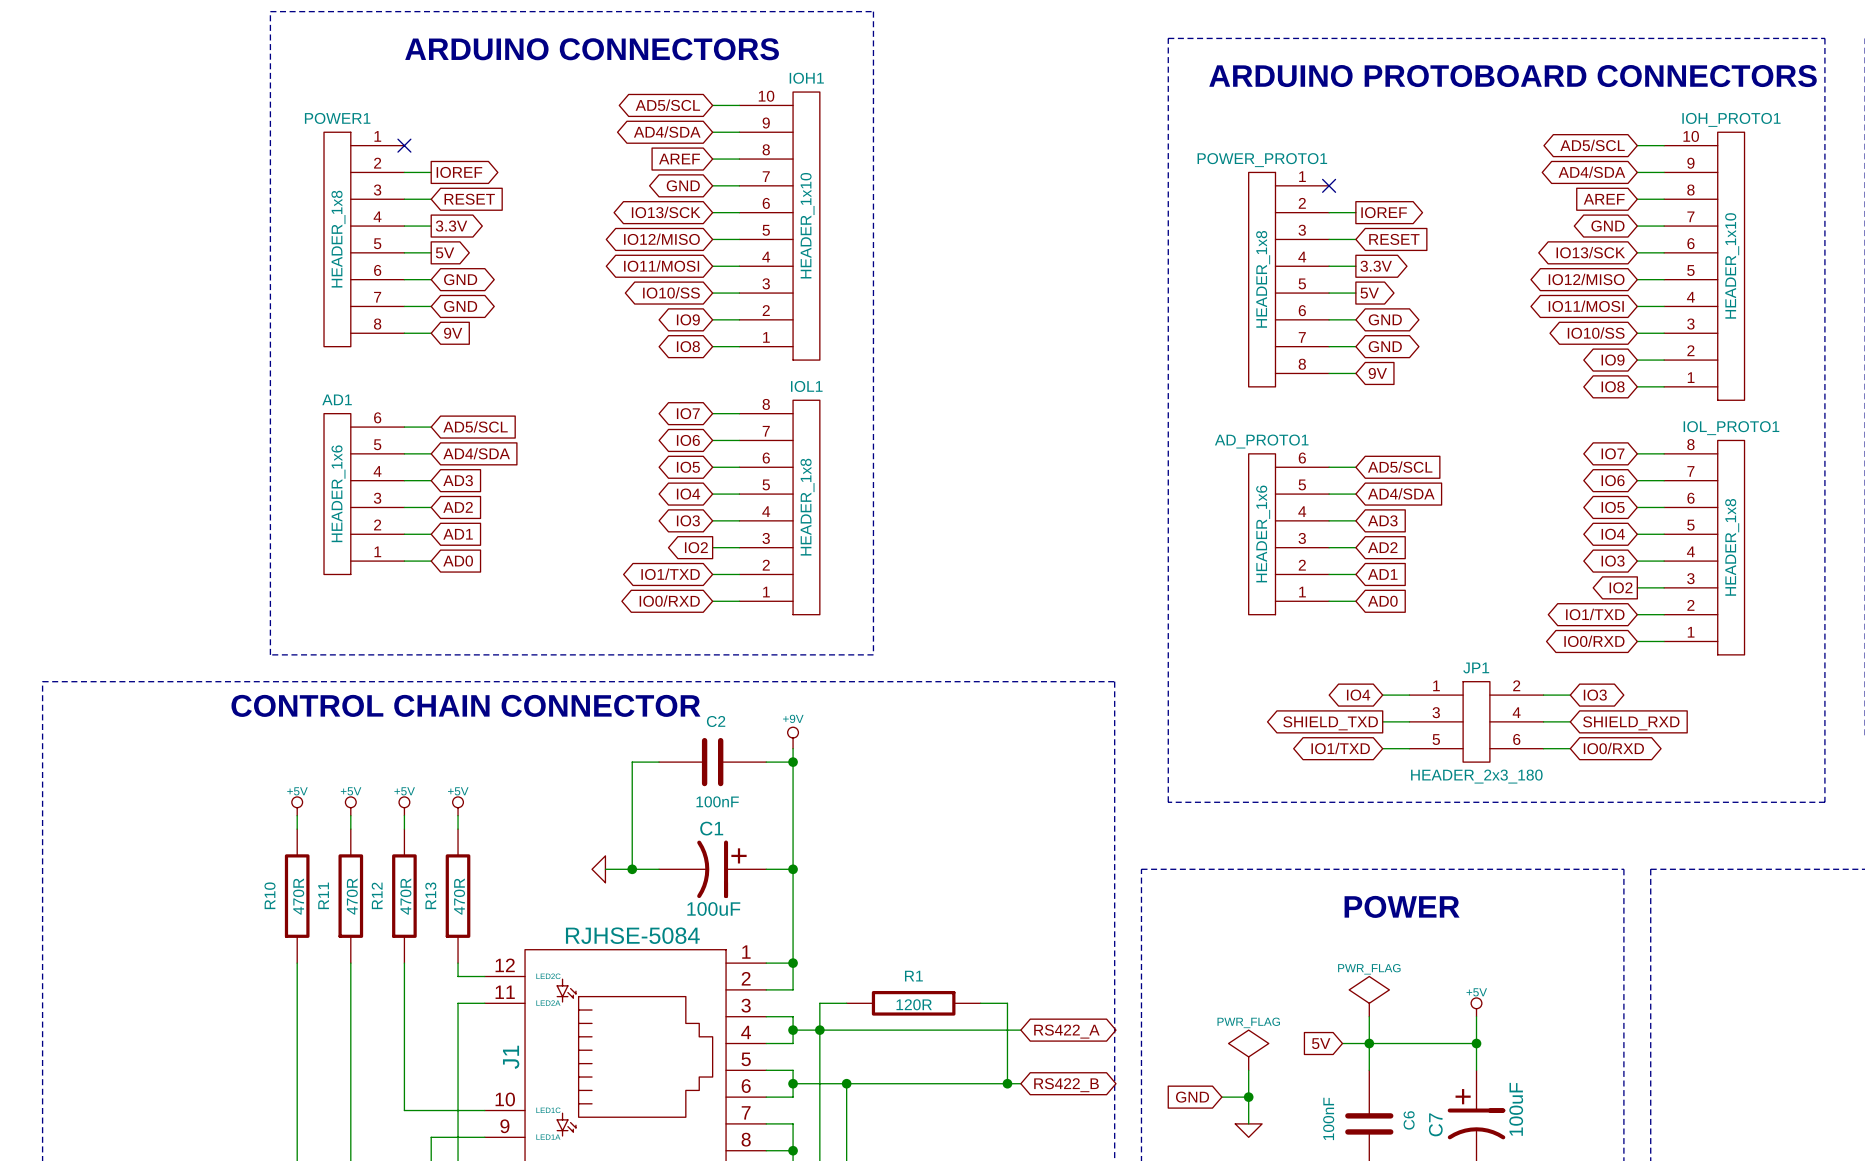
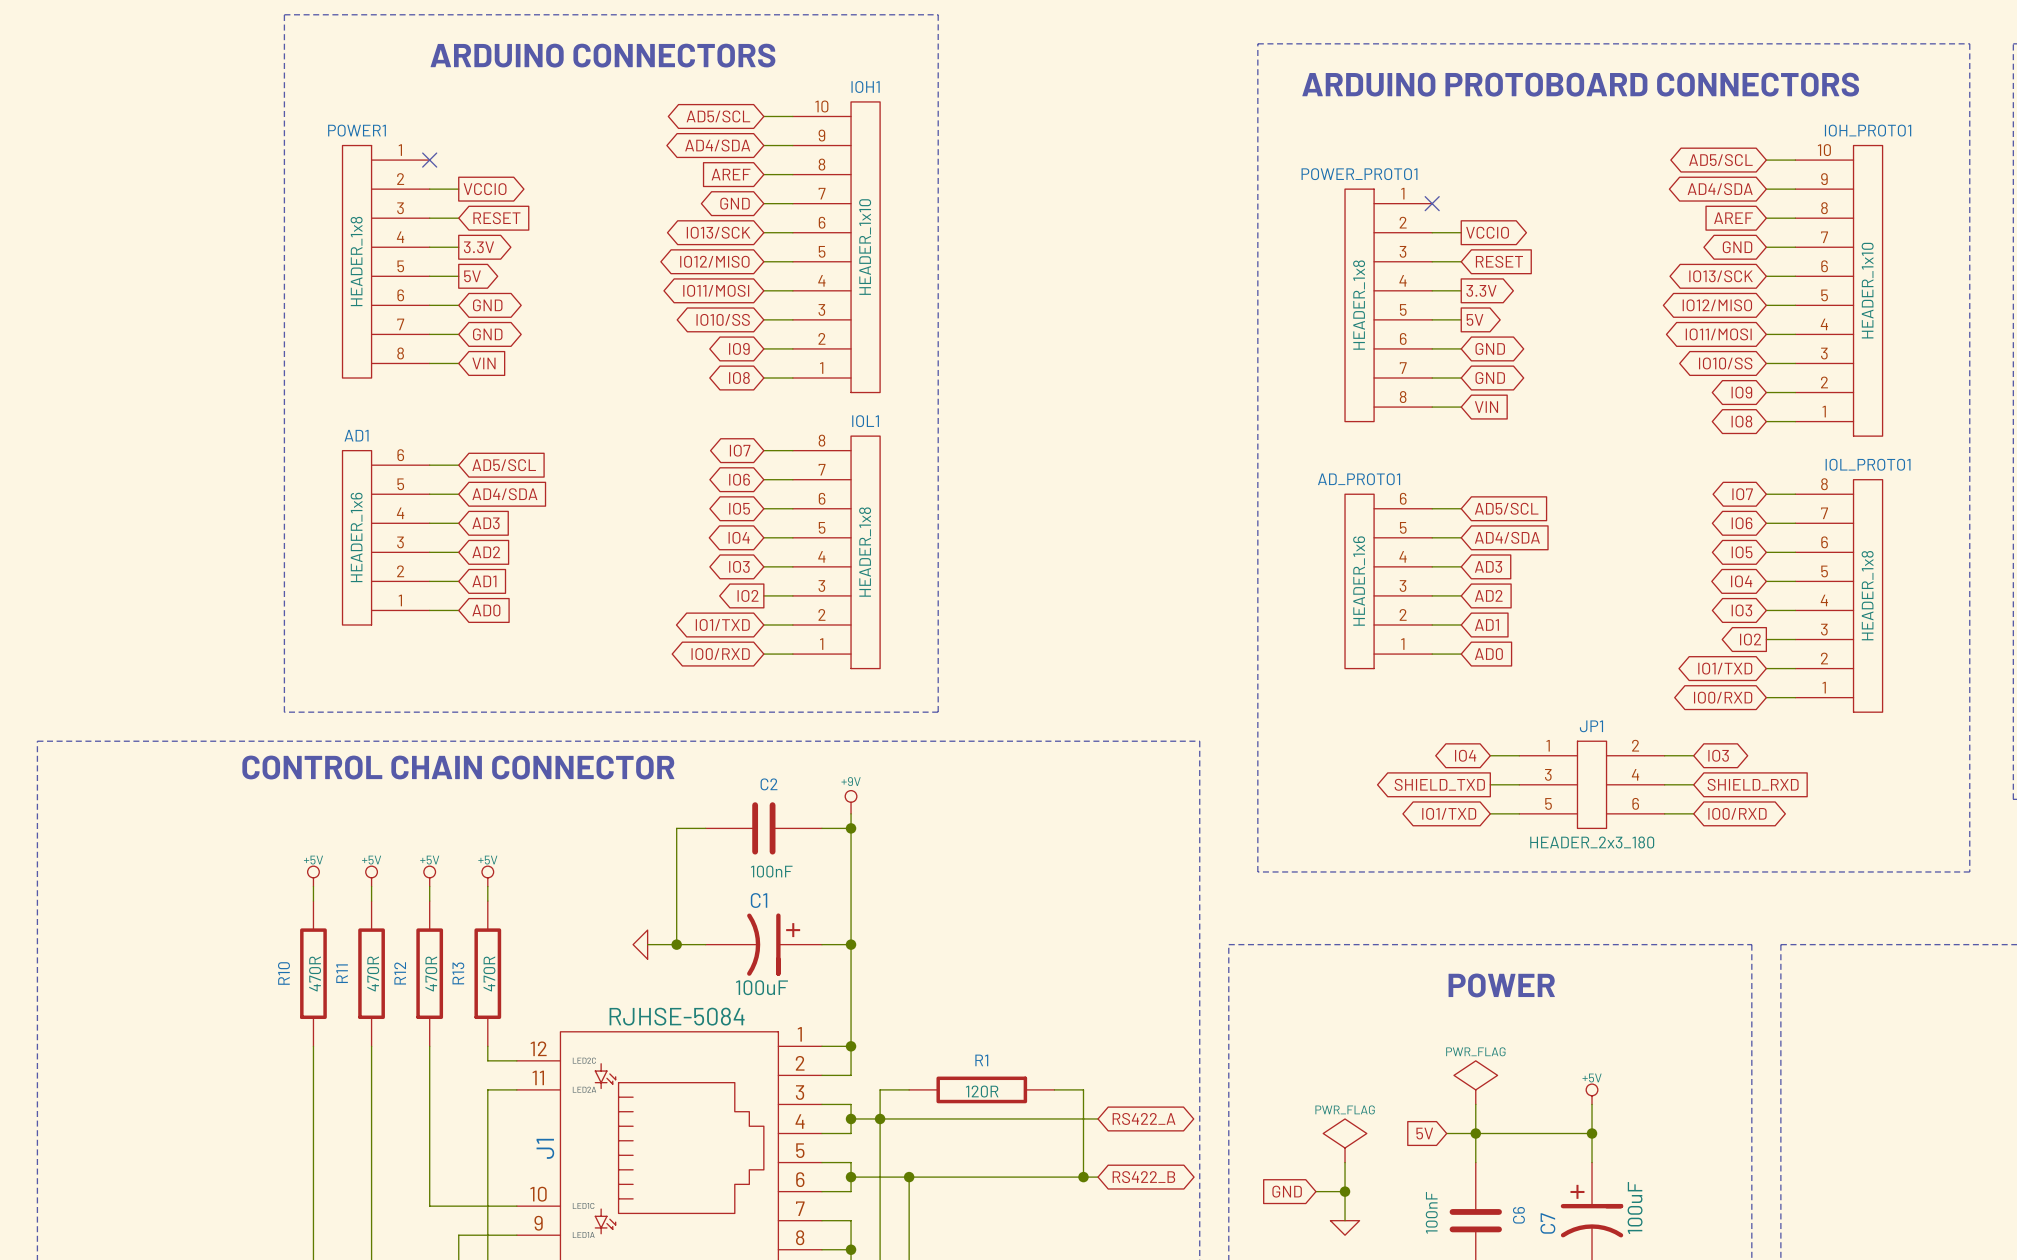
global label: IOREF (459, 172) -> VCCIO (485, 189)
global label: IOREF (1384, 212) -> VCCIO (1487, 232)
global label: 9V (453, 333) -> VIN (483, 363)
global label: 9V (1377, 373) -> VIN (1486, 407)

